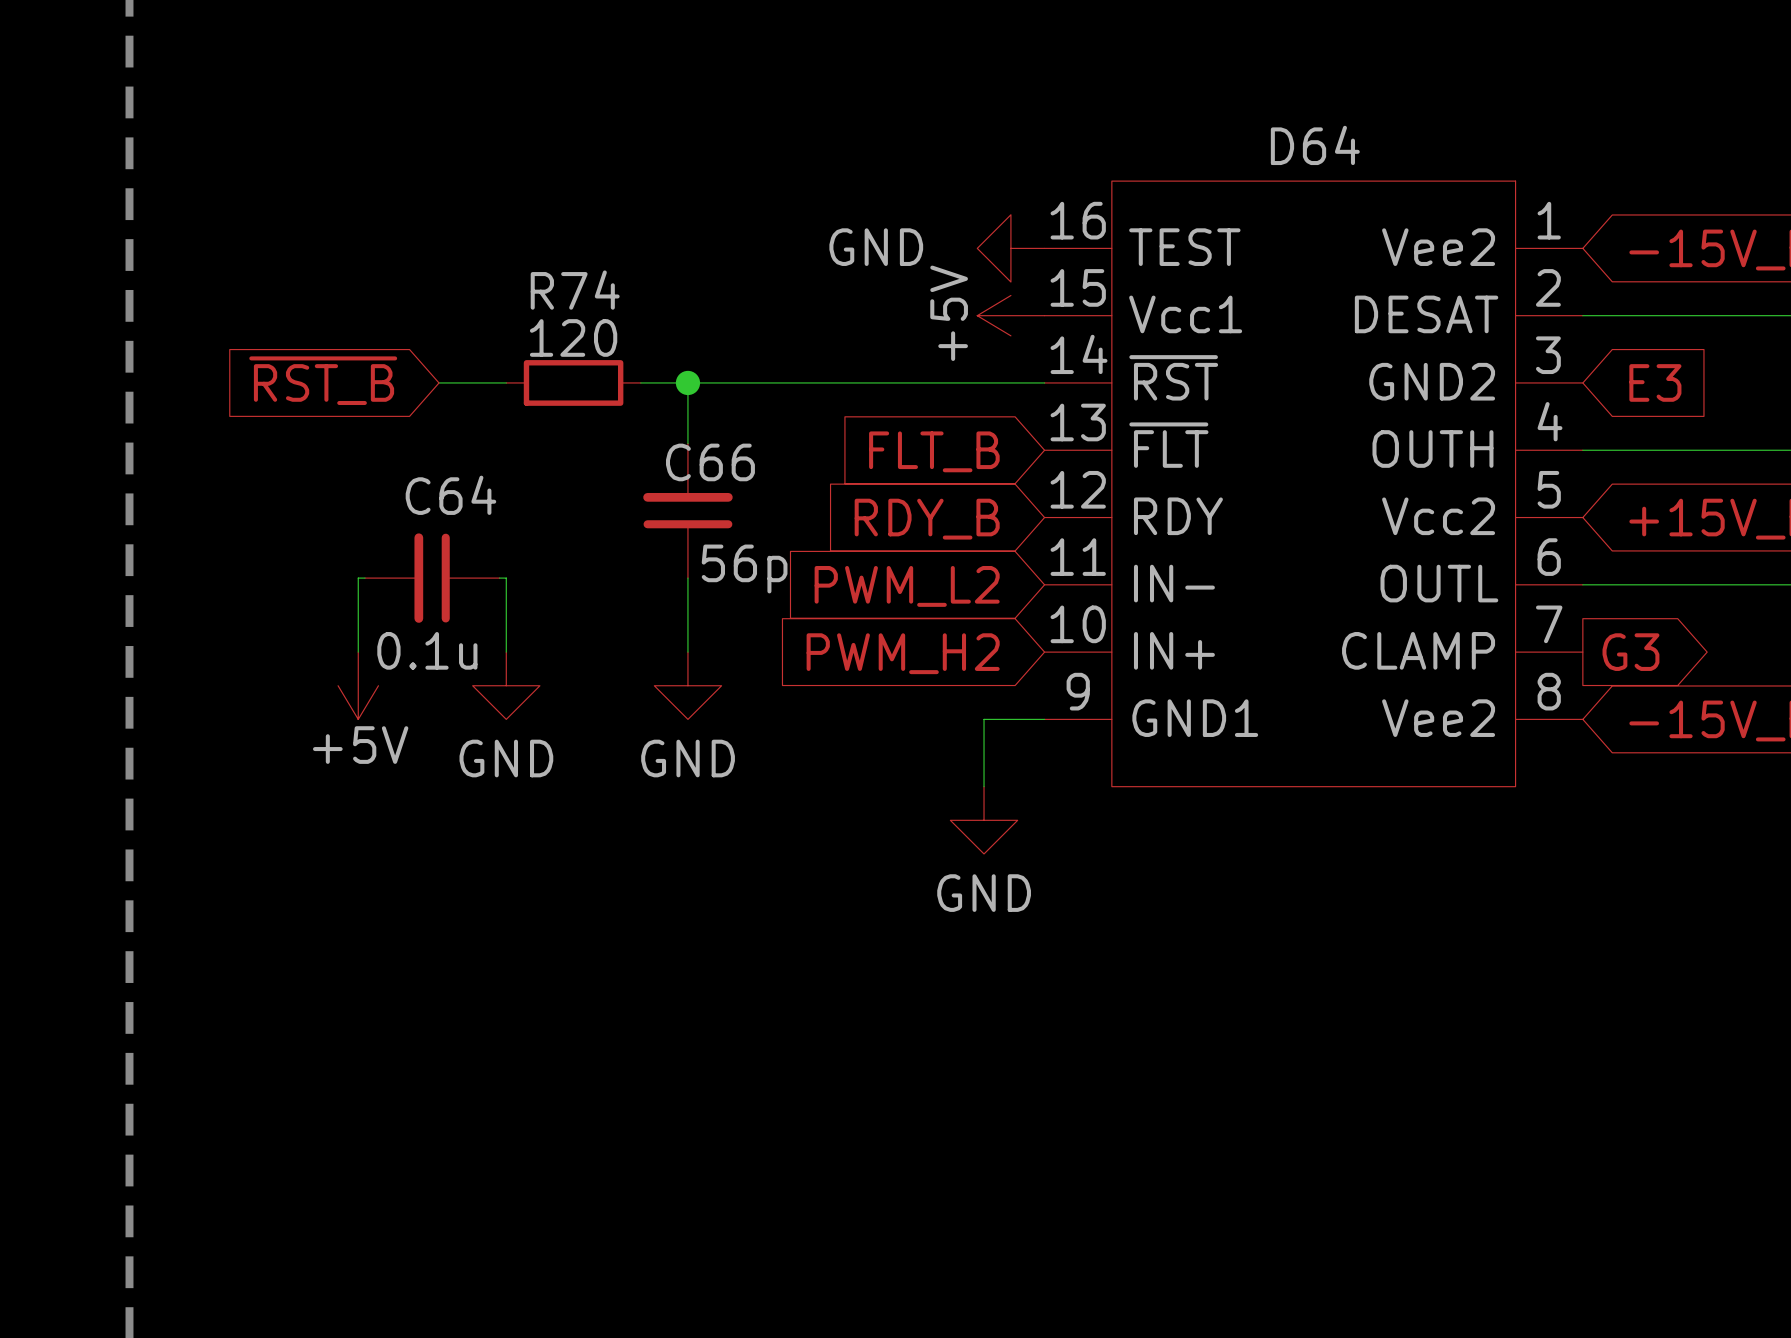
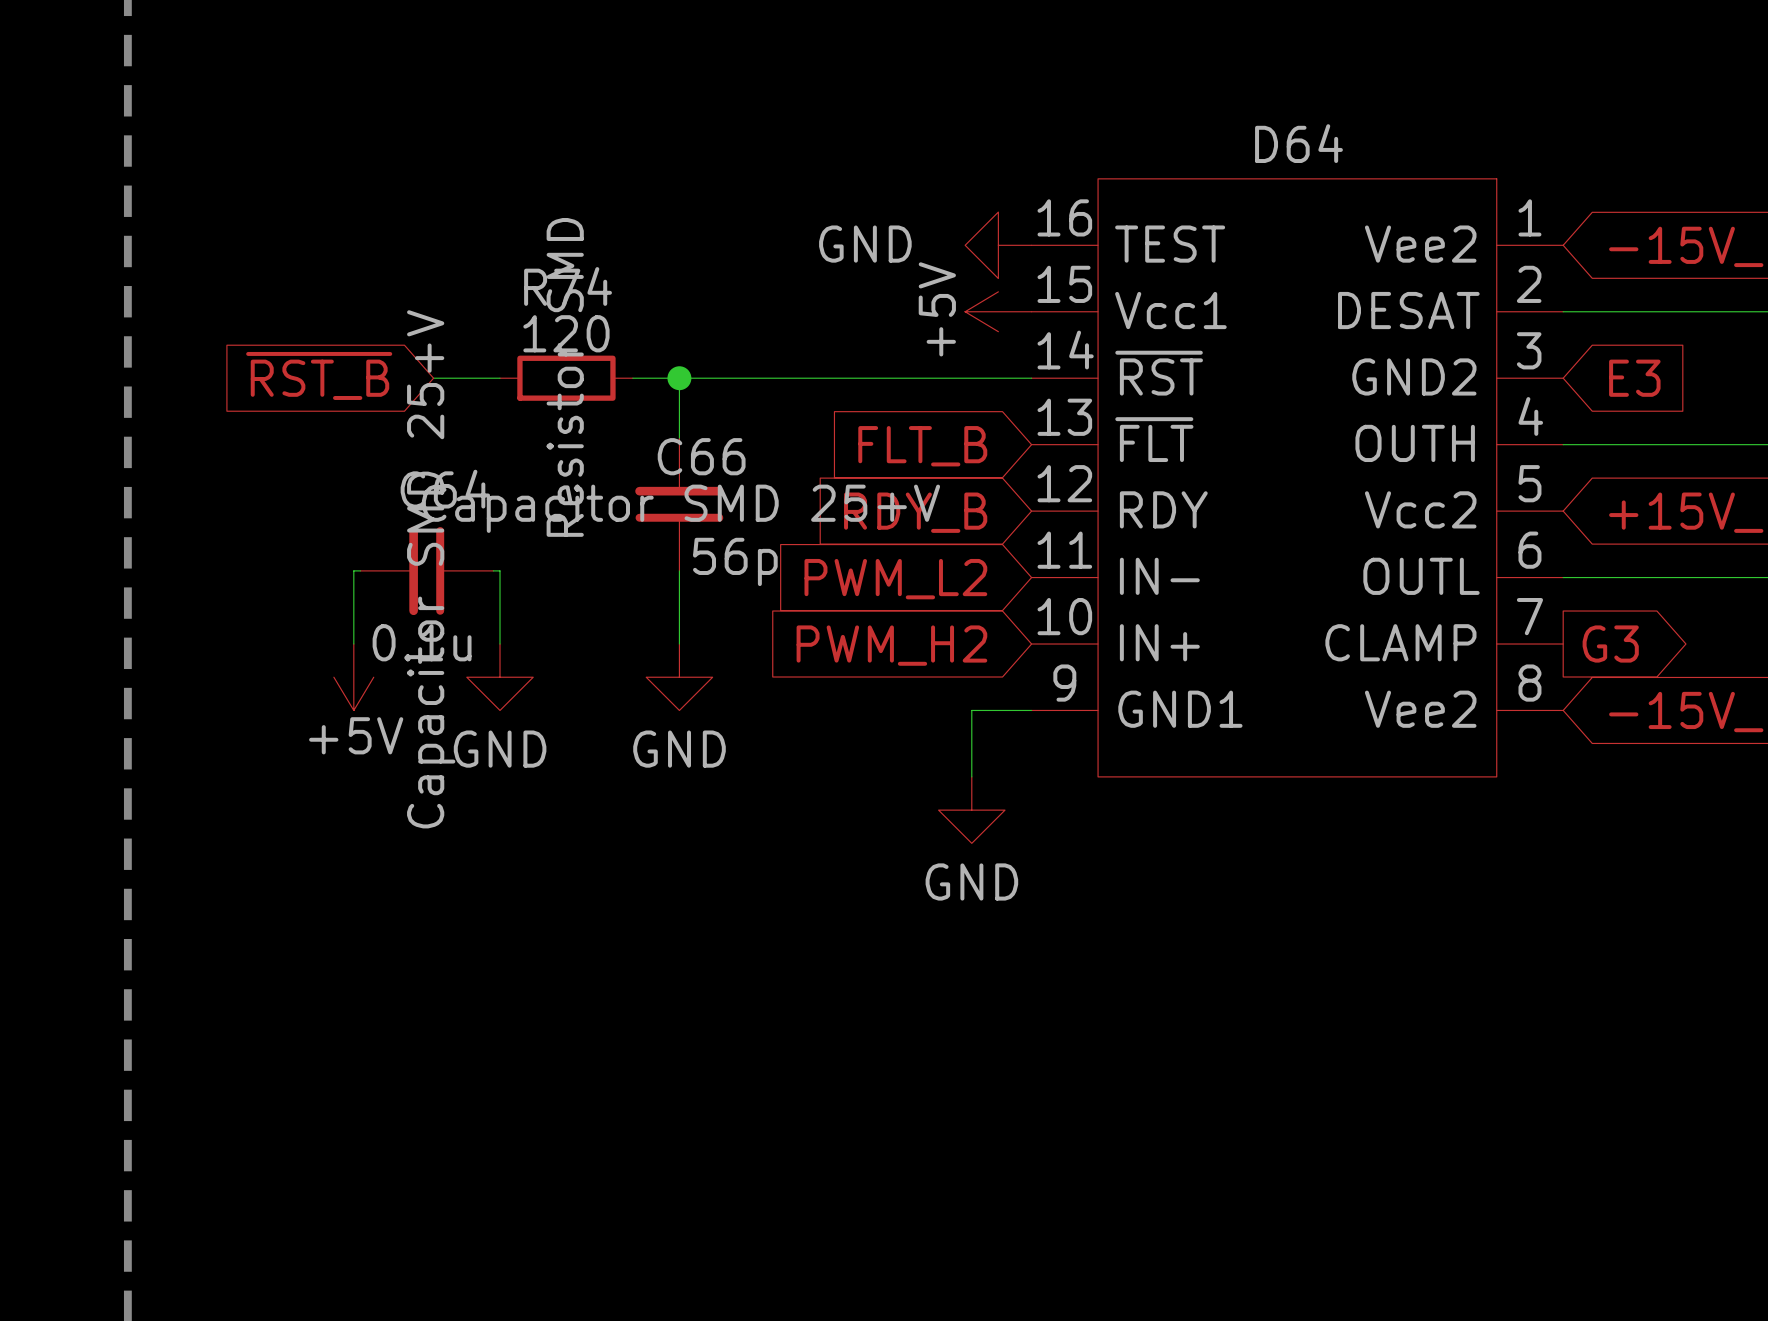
R74 text: none -> Resistor SMD (565, 377)
C66 text: none -> Capacitor SMD 25+V (681, 508)
C64 text: none -> Capacitor SMD 25+V (431, 569)

